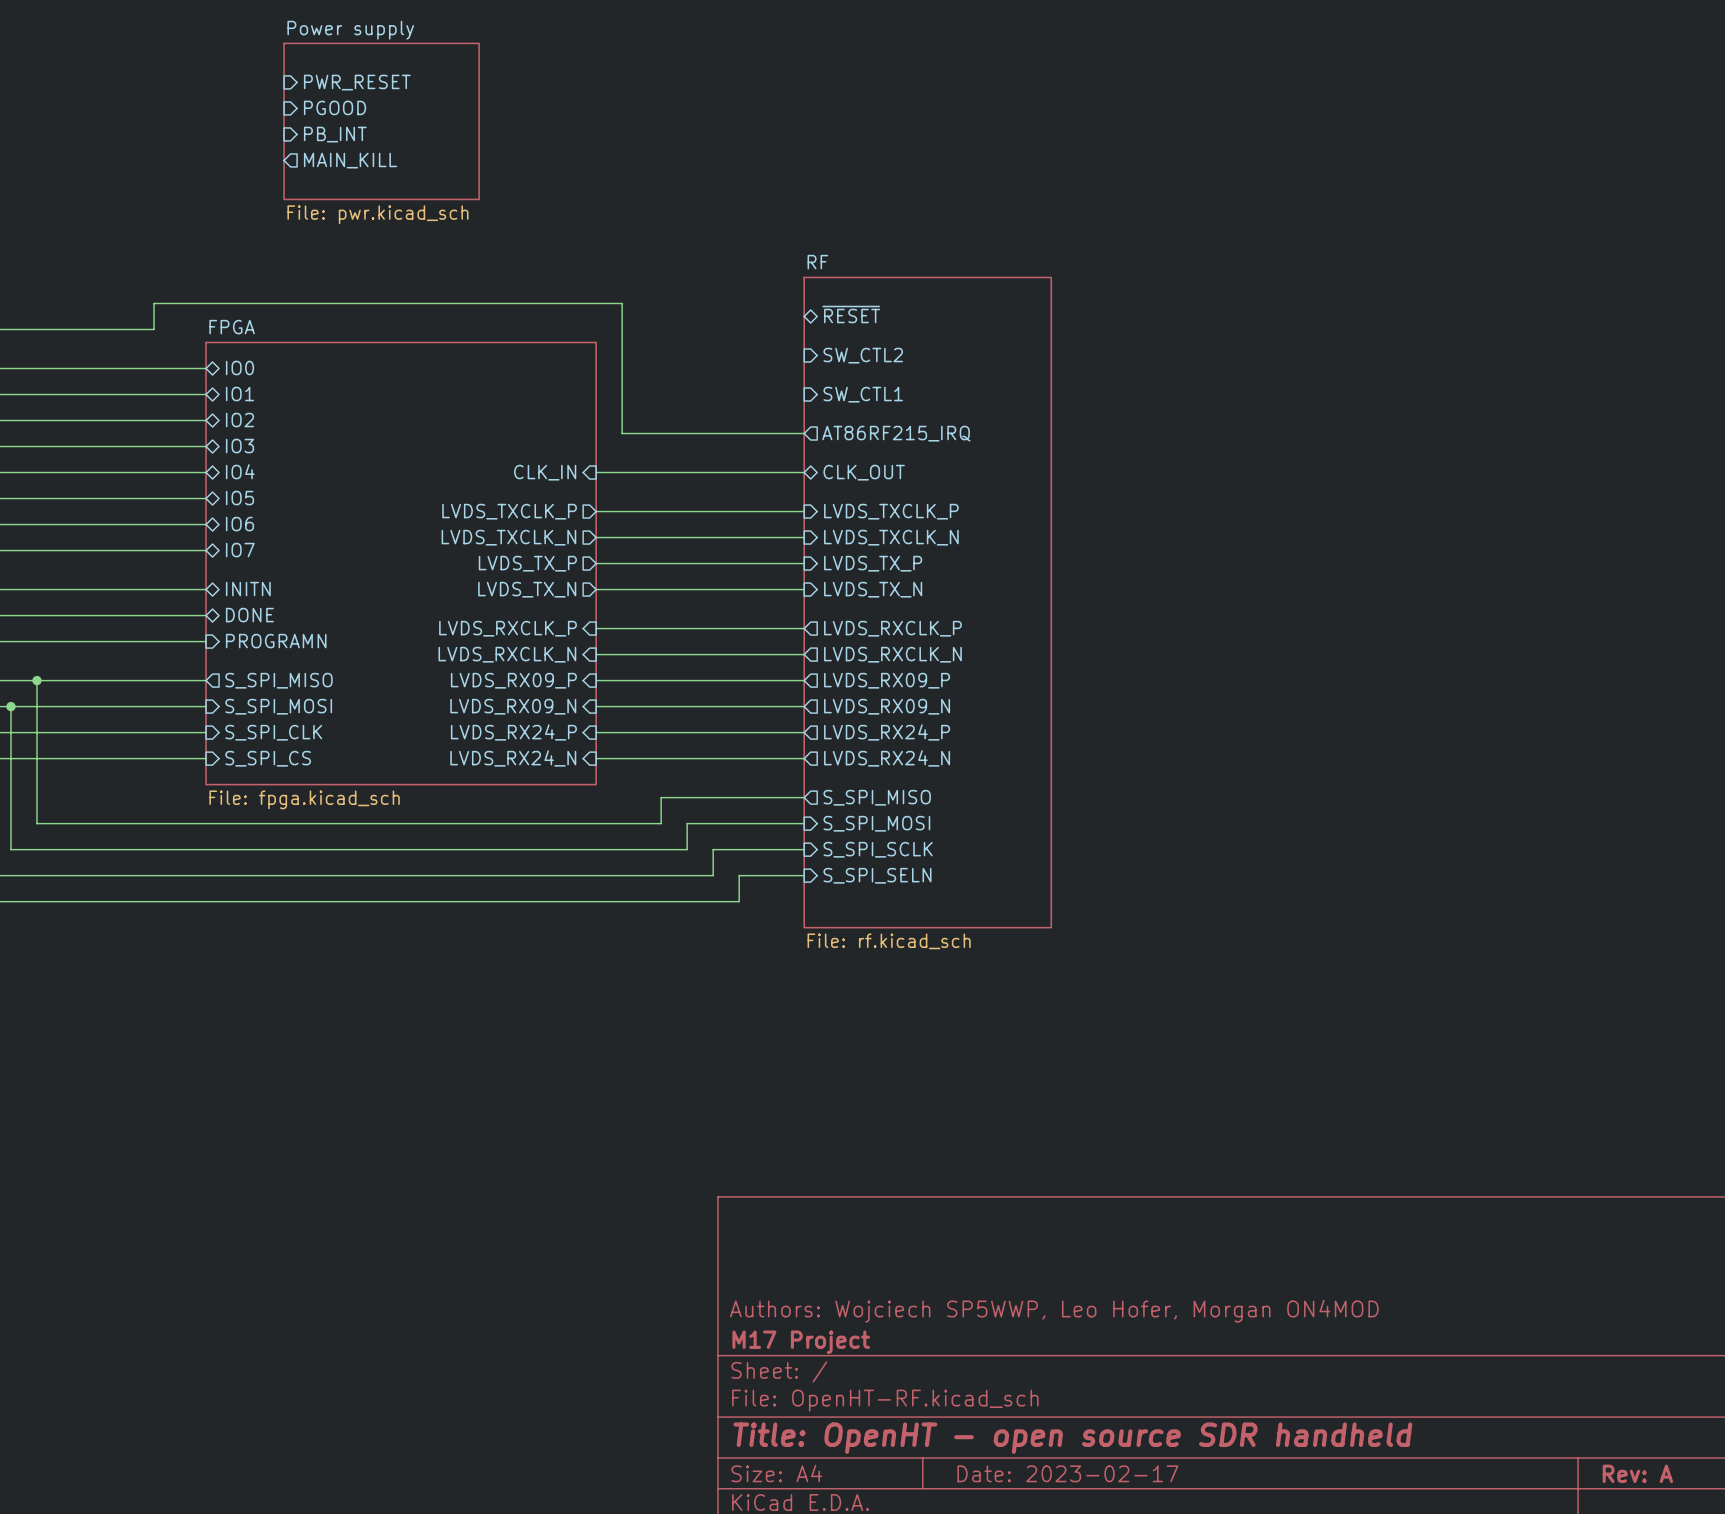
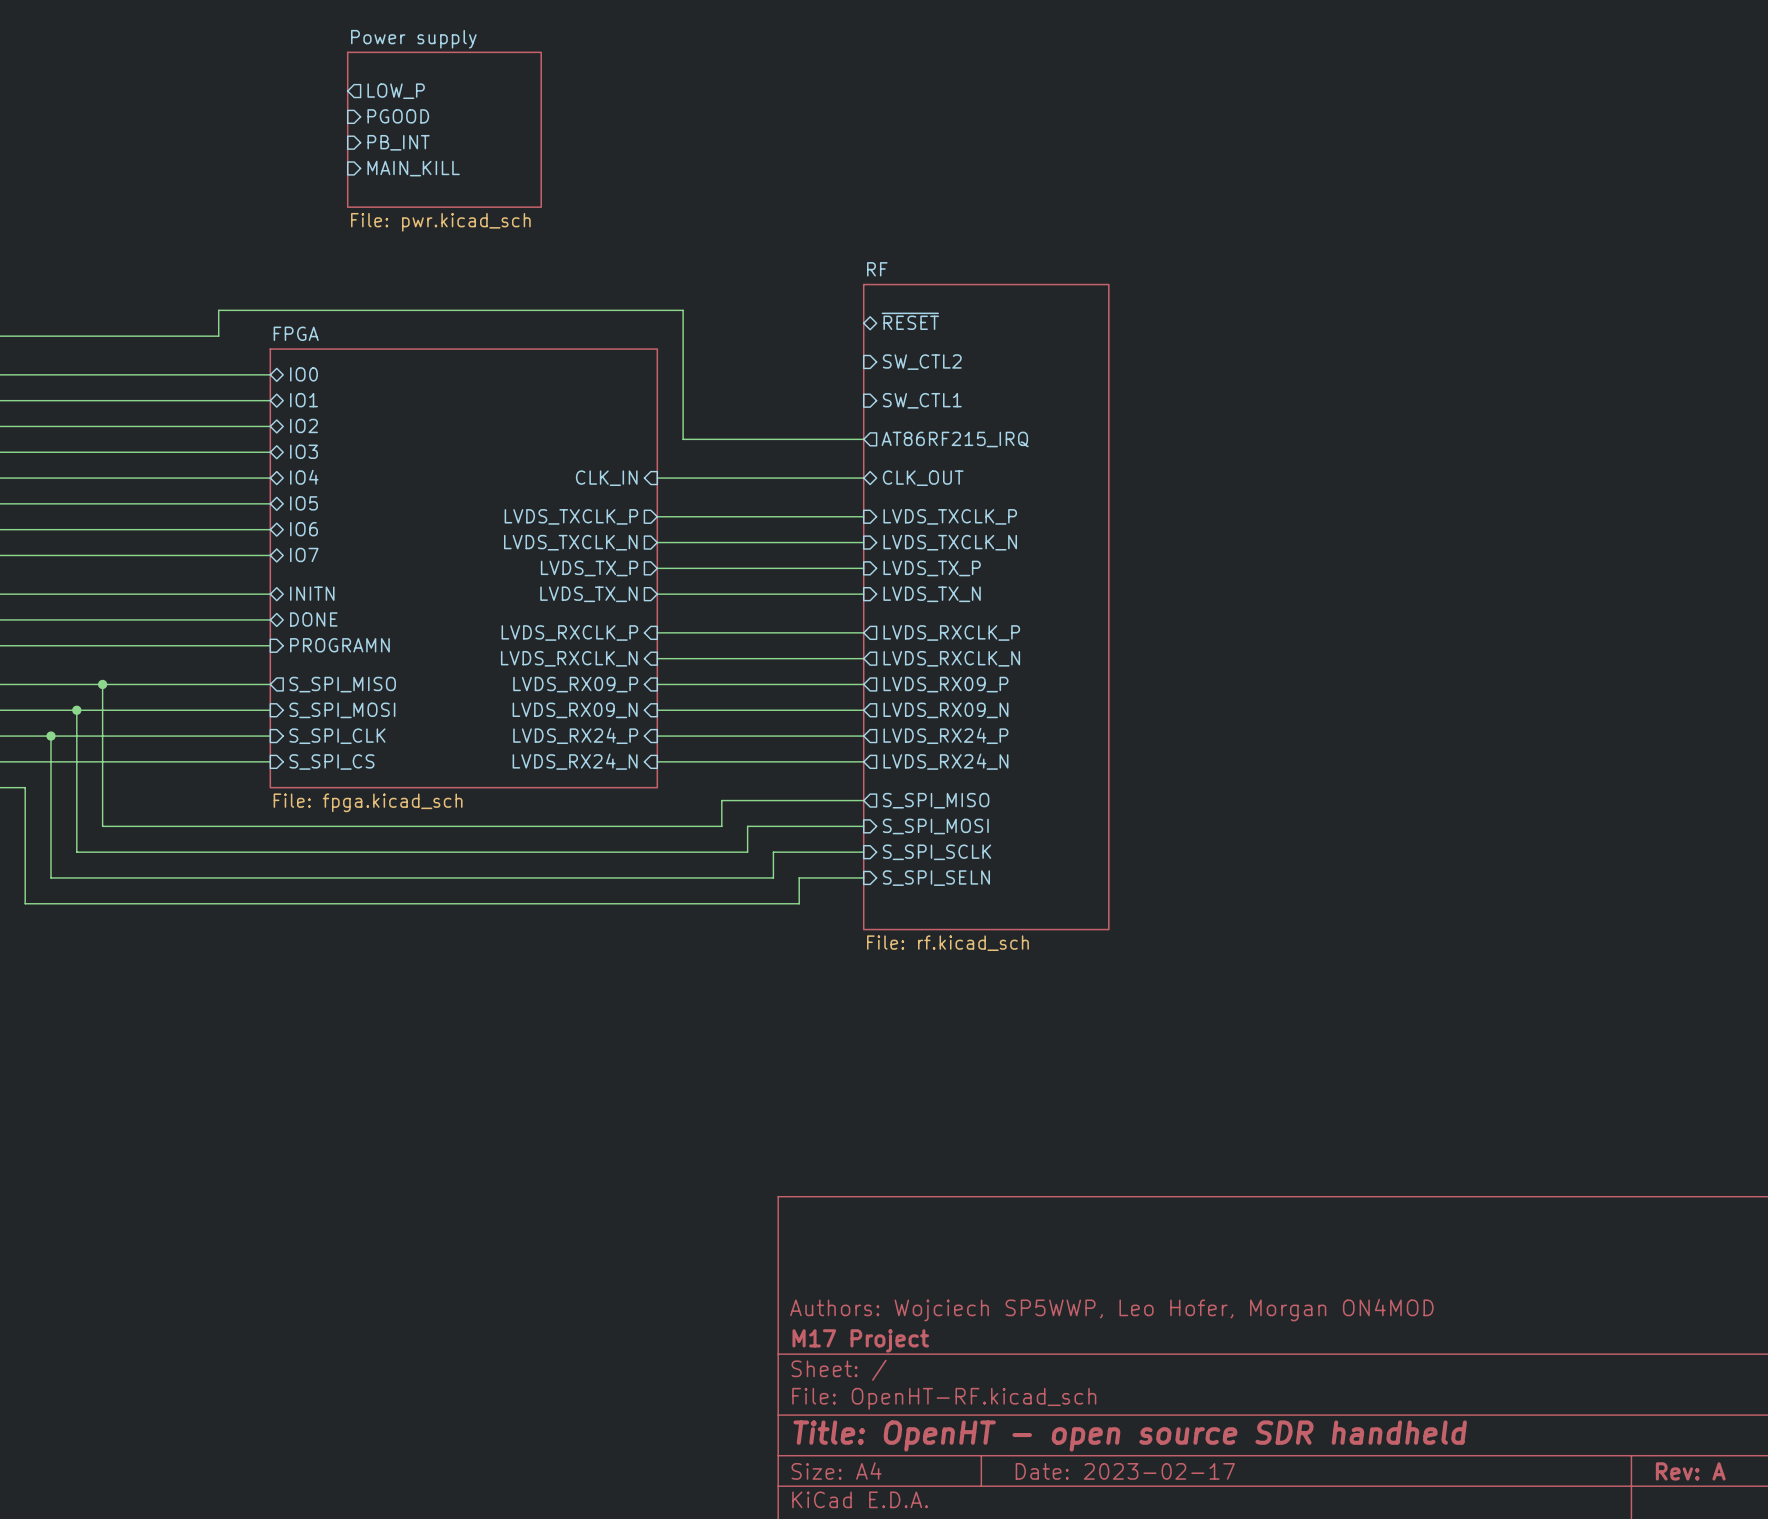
sheet pin shape: input (357, 82) -> output (396, 91)
sheet pin: PWR_RESET (357, 82) -> LOW_P (396, 91)
sheet pin shape: output (350, 160) -> input (413, 168)

